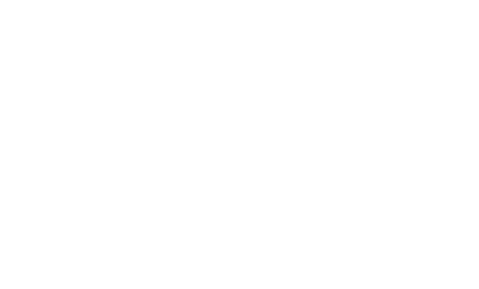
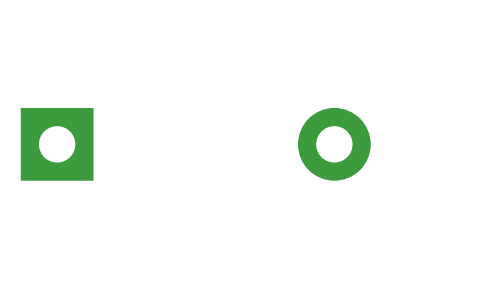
part: none -> (57, 144)
part: none -> (334, 144)

